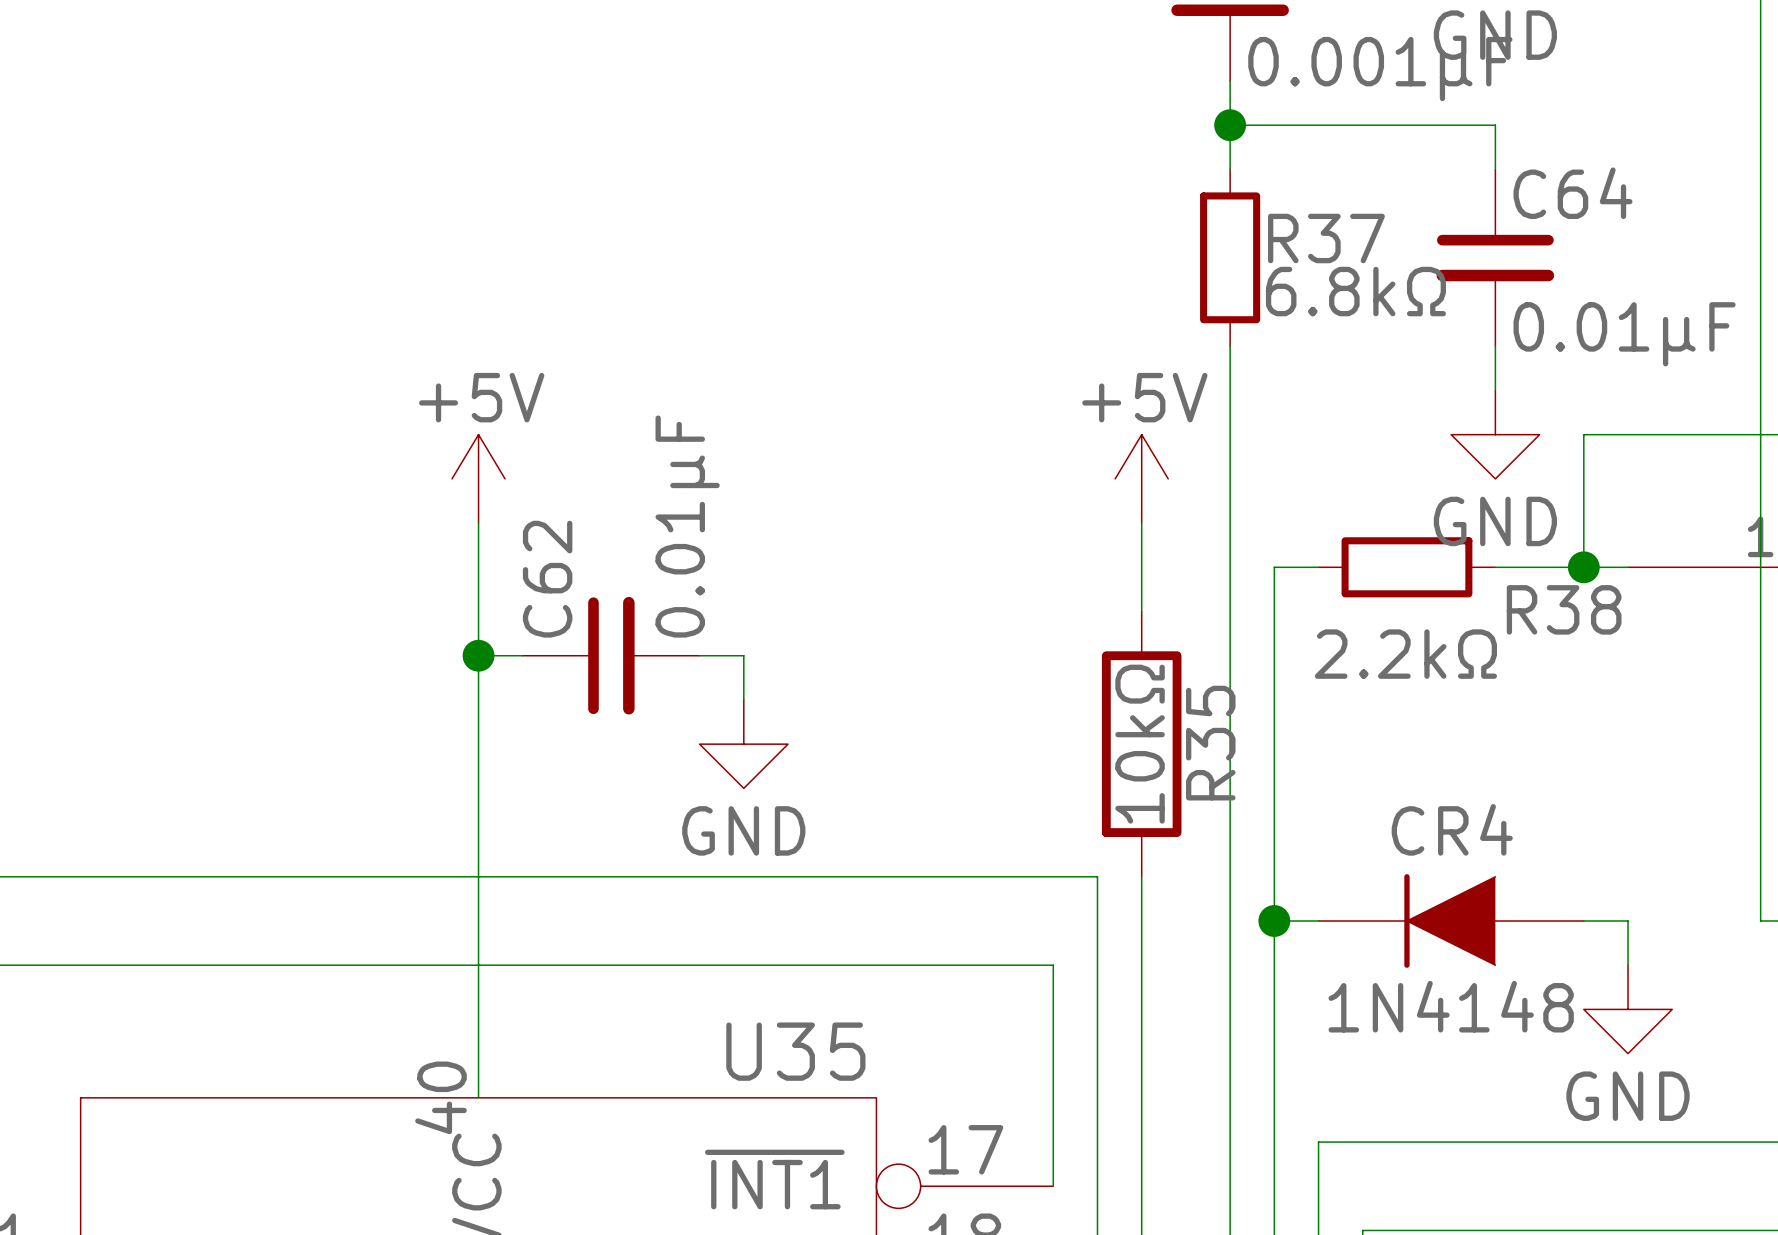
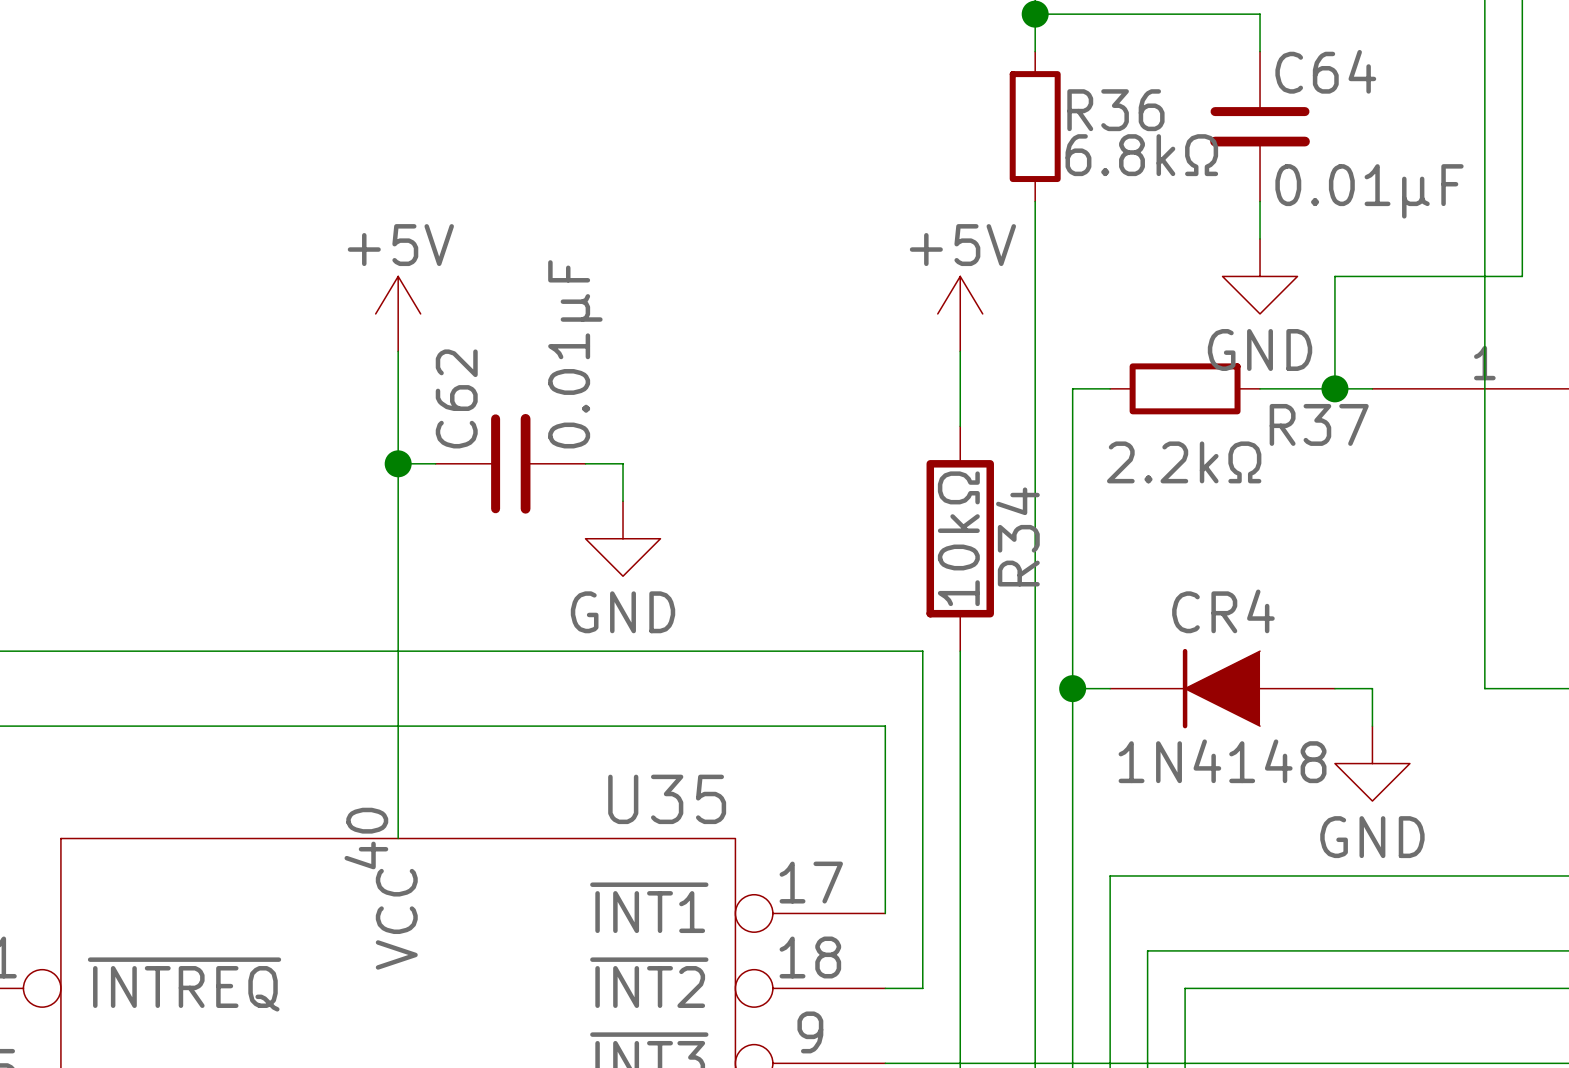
R37 name: R37 (1326, 238) -> R36 (1115, 110)
R38 name: R38 (1564, 609) -> R37 (1319, 424)
R35 name: R35 (1210, 743) -> R34 (1017, 536)

